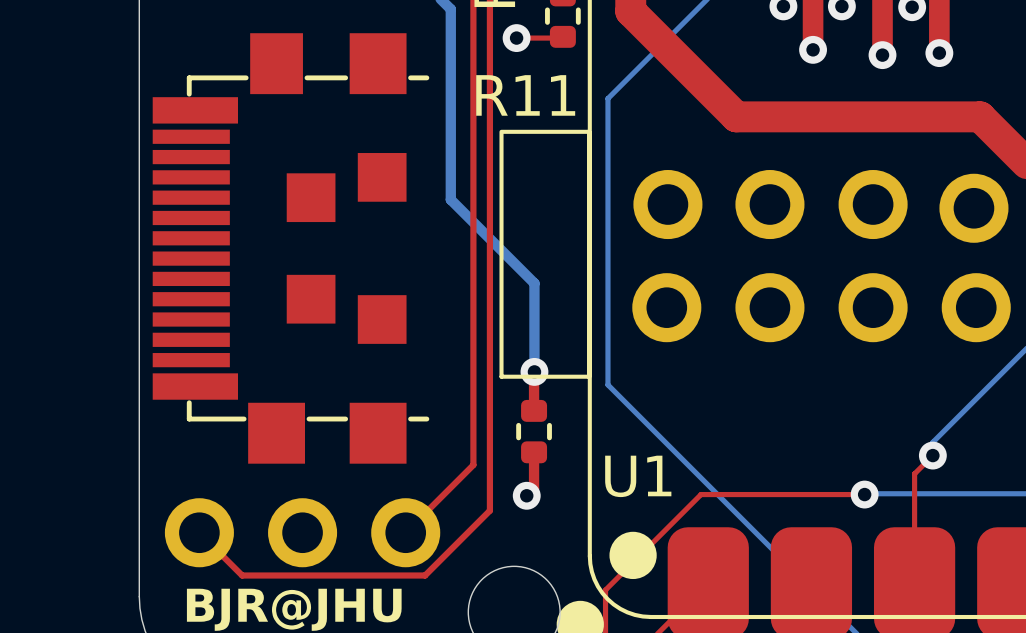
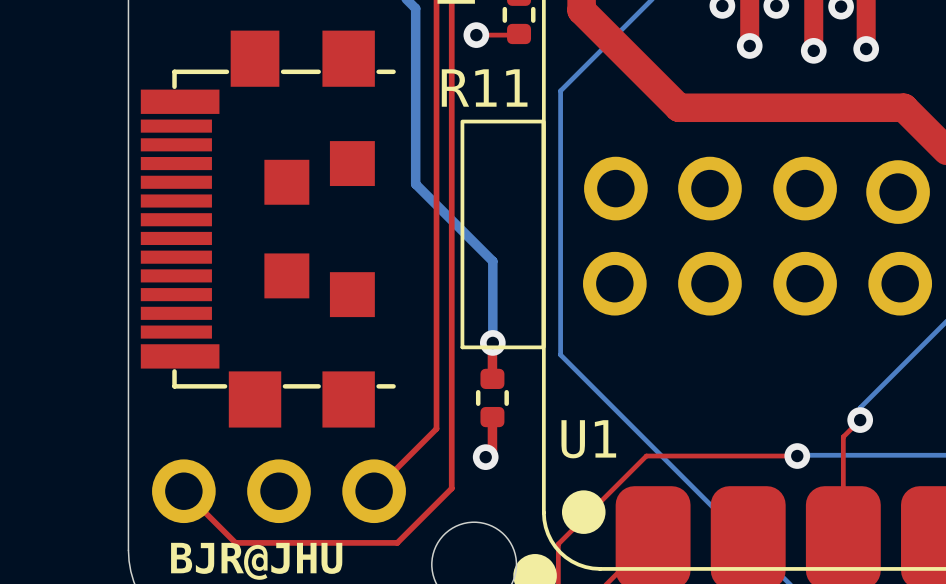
top track: (489, 510) (425, 575) (242, 575) -> (451, 470) (451, 488) (397, 542) (235, 542) (223, 530)

